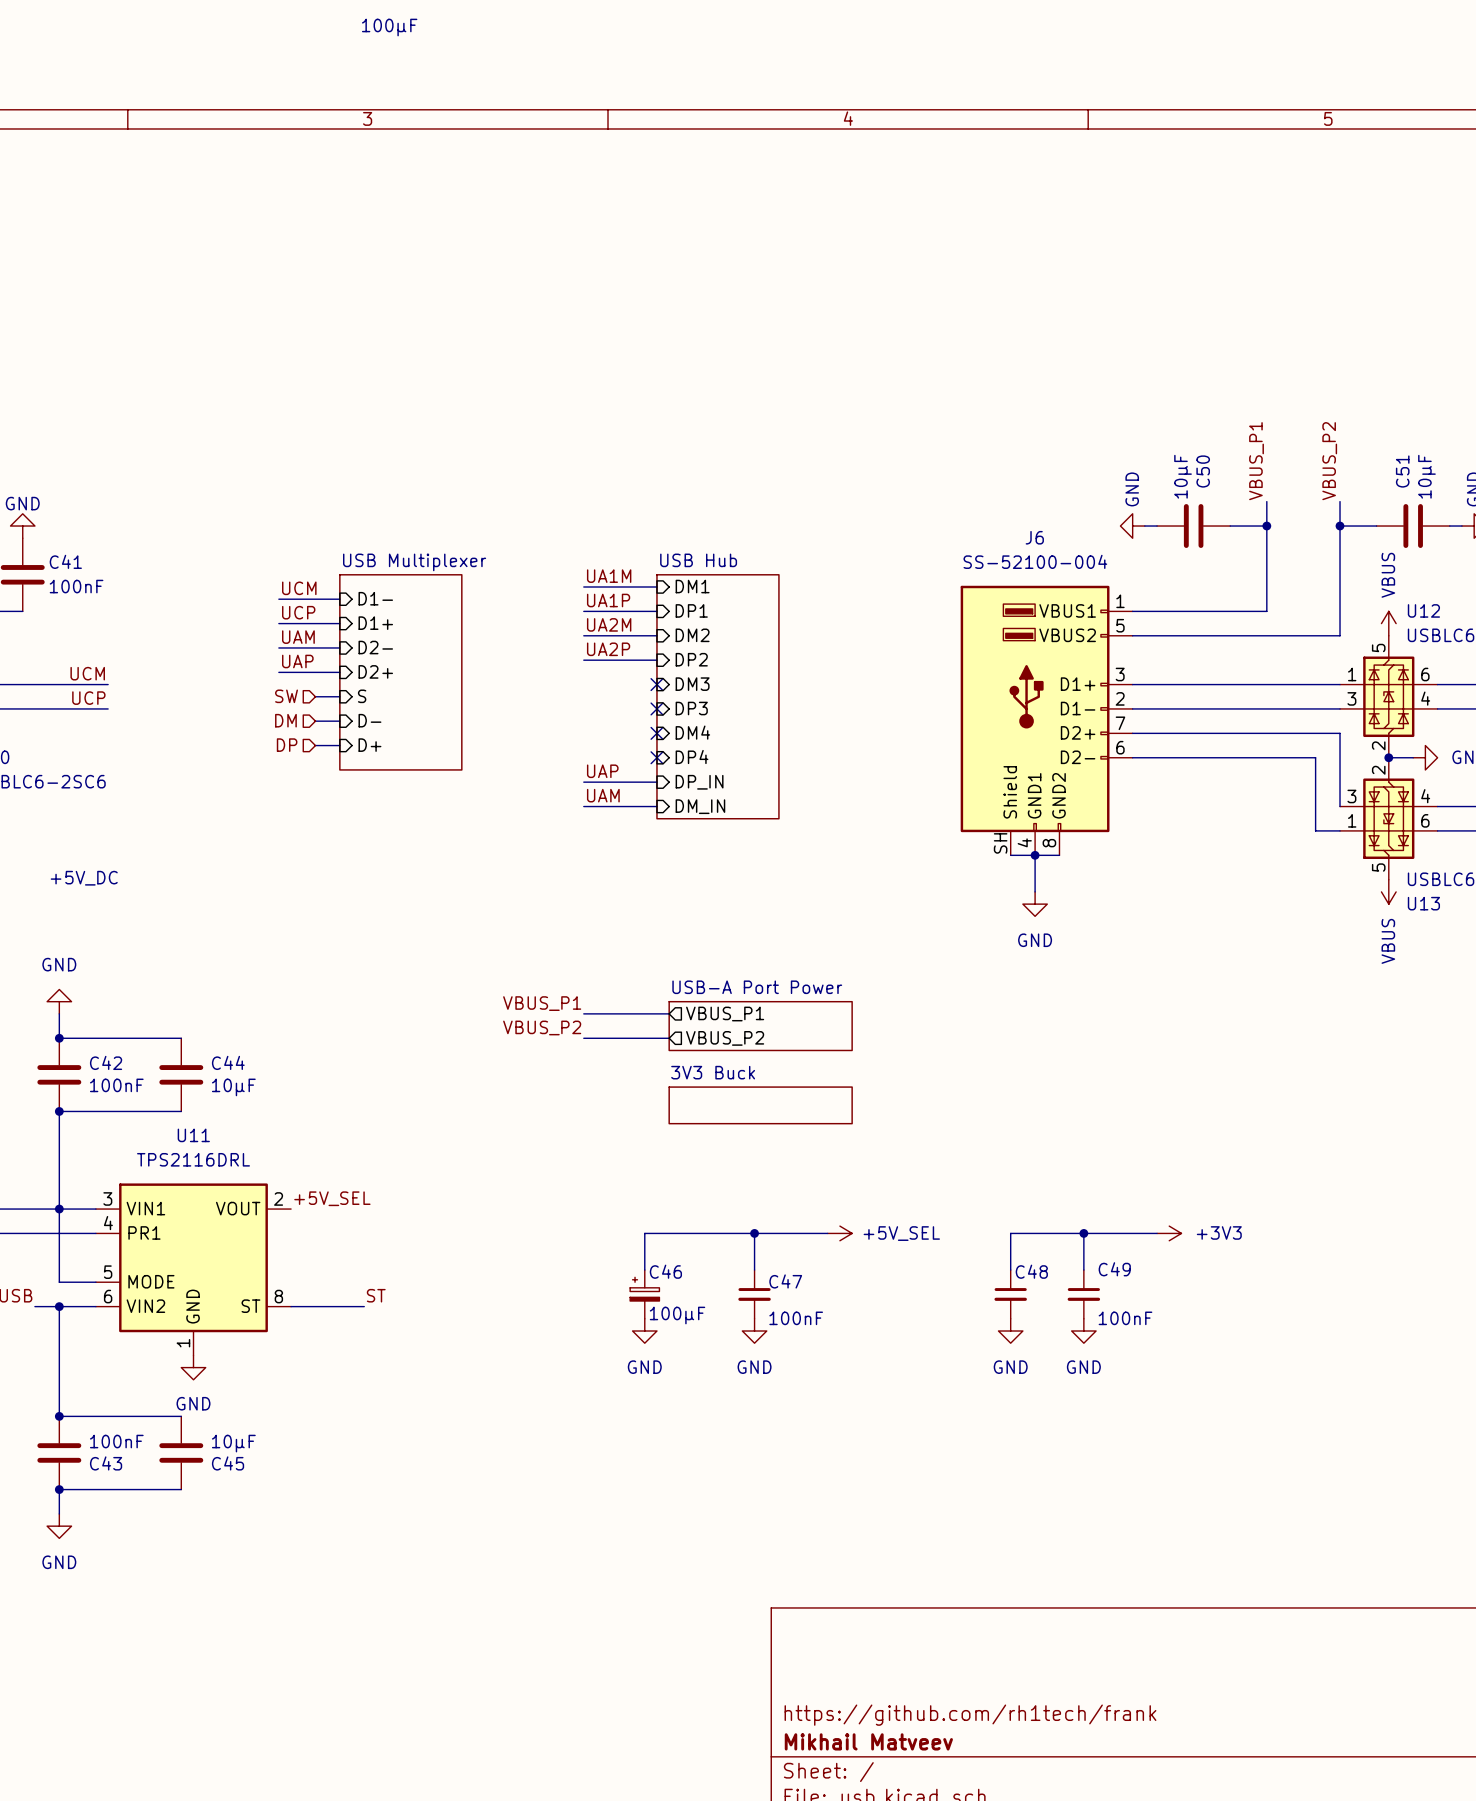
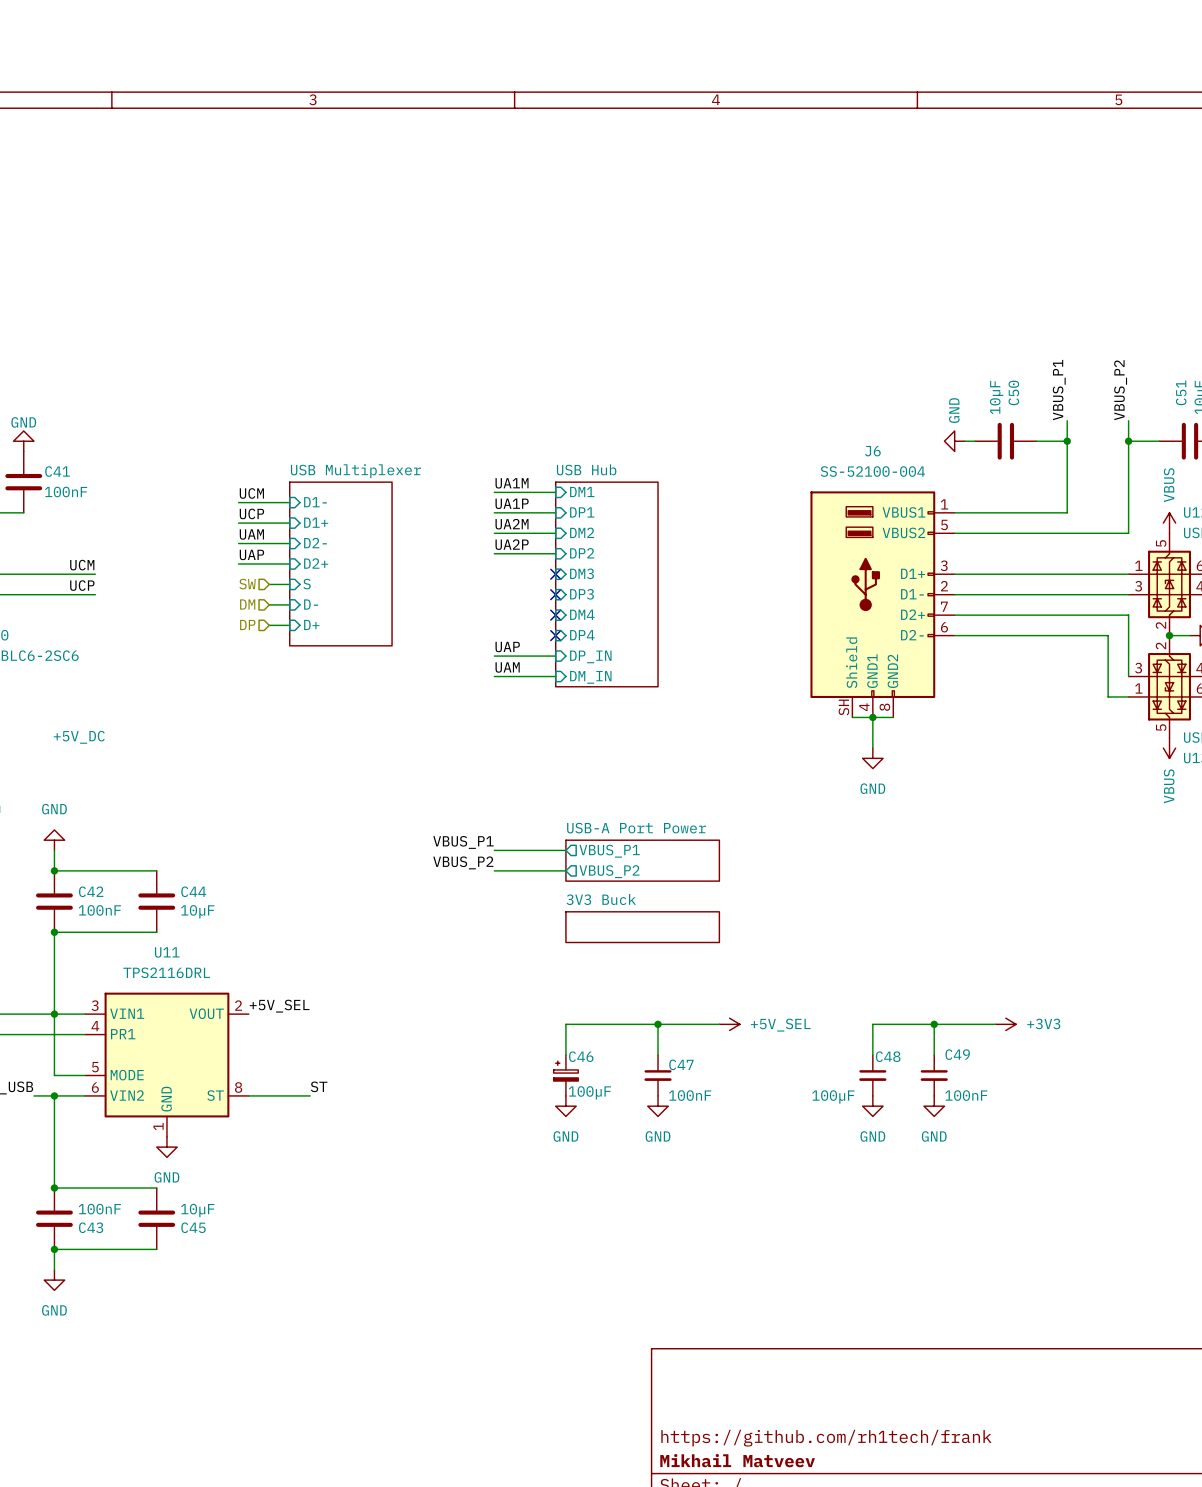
C48 value position: 100µF (389, 27) -> 100µF (833, 1096)
wire: (754, 1233) (754, 1270) -> (658, 1024) (658, 1055)
junction position: (754, 1233) -> (658, 1024)
wire: (827, 1233) (644, 1233) (644, 1270) -> (719, 1024) (565, 1024) (565, 1055)
power symbol position: +5V_SEL (839, 1233) -> +5V_SEL (729, 1024)
wire: (1083, 1233) (1083, 1270) -> (934, 1024) (934, 1055)
junction position: (1083, 1233) -> (934, 1024)
wire: (1157, 1233) (1010, 1233) (1010, 1270) -> (995, 1024) (872, 1024) (872, 1055)
power symbol position: +3V3 (1169, 1233) -> +3V3 (1005, 1024)
C46 position: (644, 1294) -> (565, 1075)
C47 position: (754, 1294) -> (658, 1075)
C48 position: (1010, 1294) -> (872, 1075)
C49 position: (1083, 1294) -> (934, 1075)
power symbol: none -> GND (872, 1106)
power symbol: none -> GND (934, 1106)
power symbol position: GND (644, 1331) -> GND (565, 1106)
power symbol position: GND (754, 1331) -> GND (658, 1106)
power symbol: GND (1010, 1331) -> none
power symbol: GND (1083, 1331) -> none

